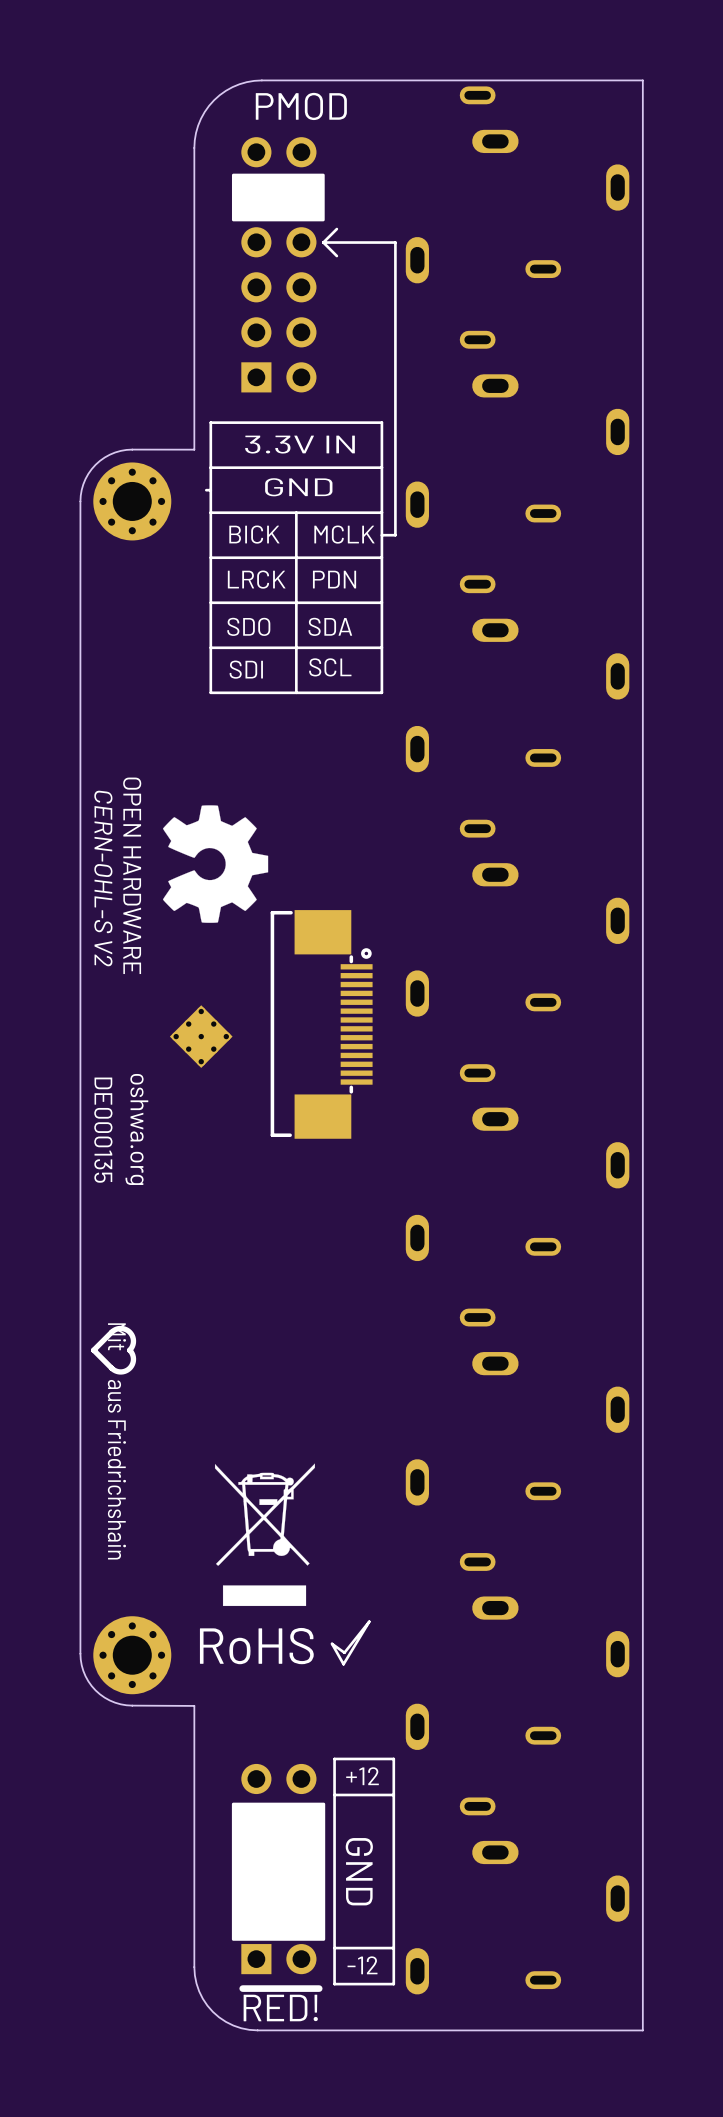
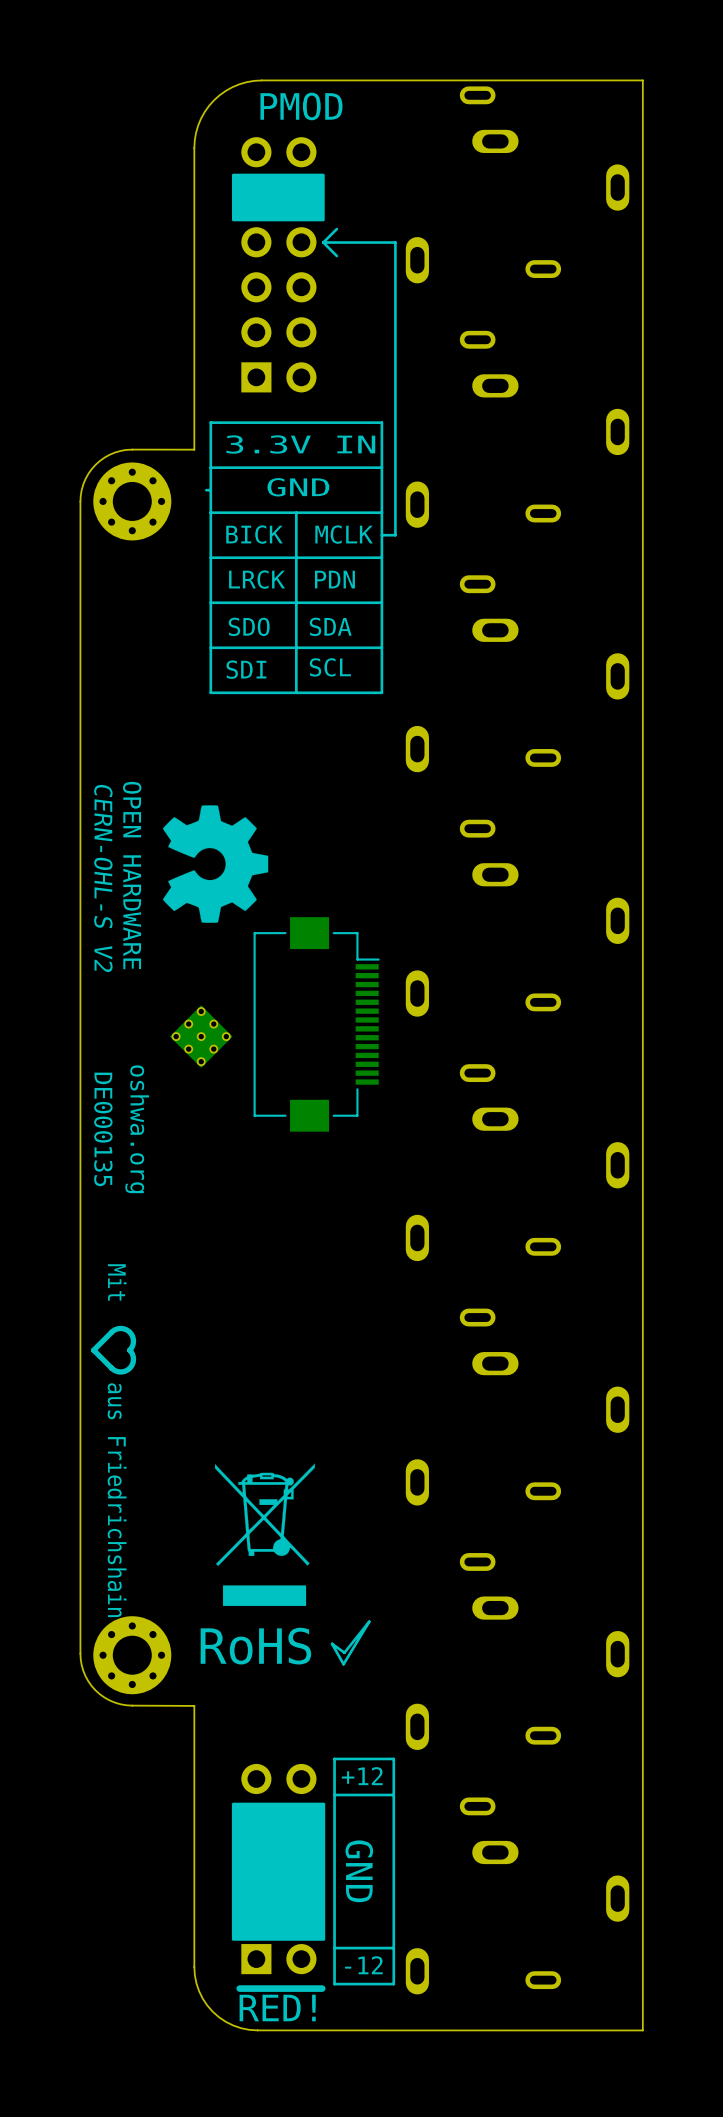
part footprint: [270, 910, 373, 1139] -> [253, 917, 380, 1132]

